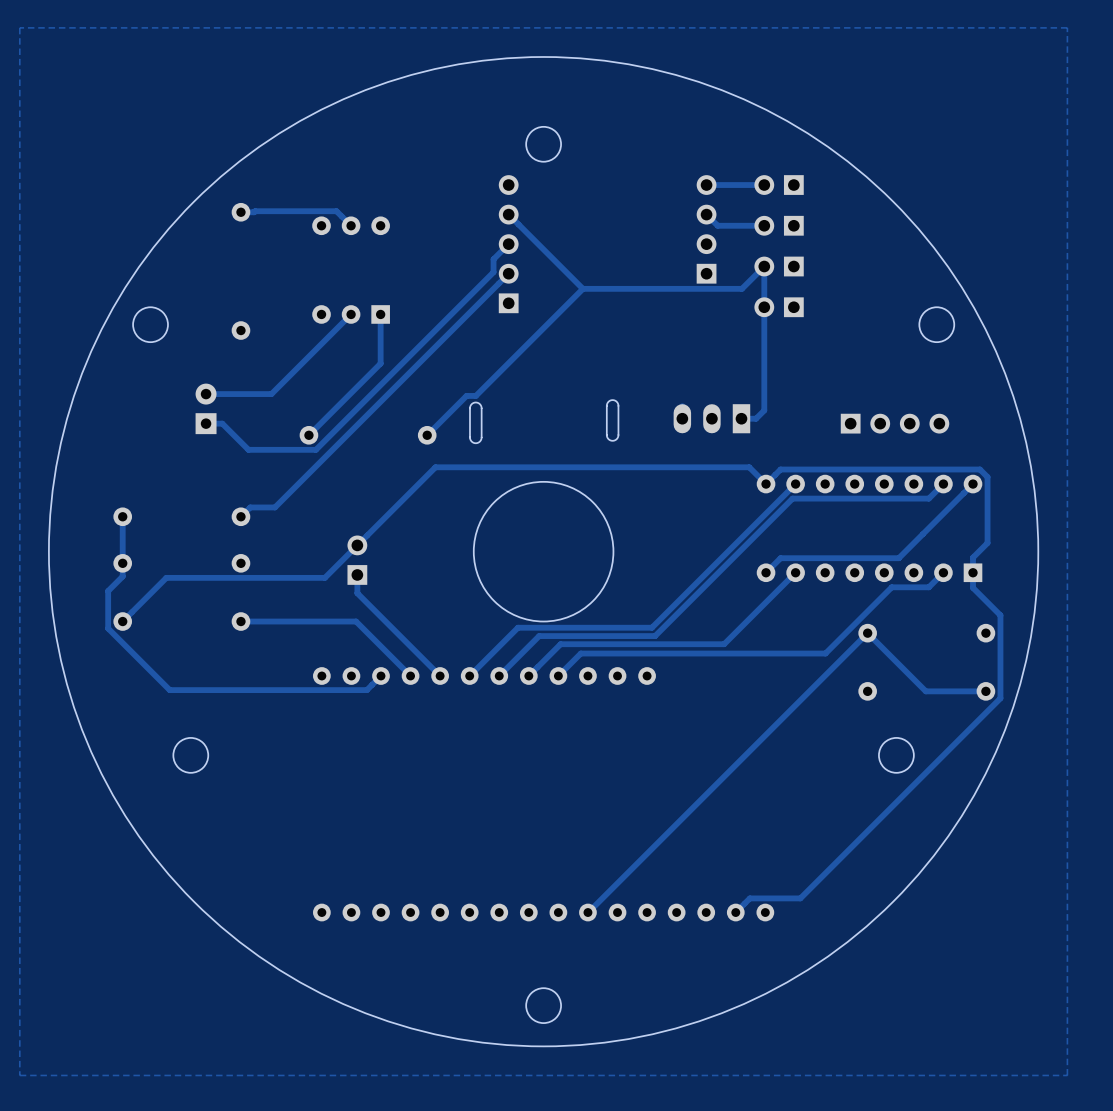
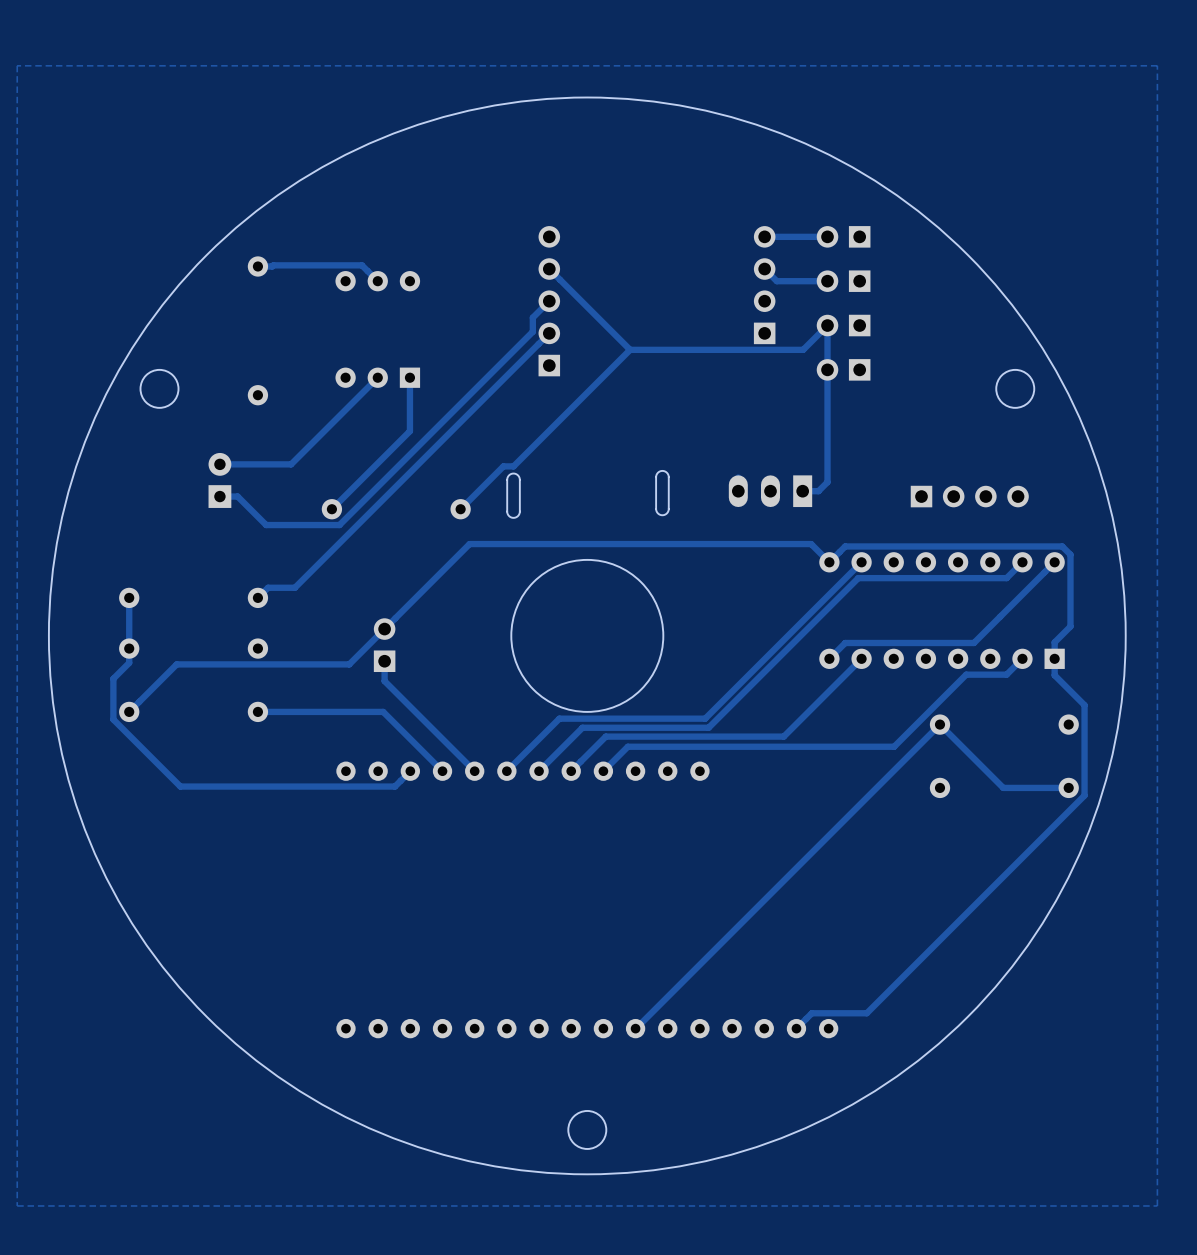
round board edge: [525, 125, 562, 163] -> none
round board edge: [172, 737, 210, 774] -> none
round board edge: [878, 737, 915, 774] -> none

